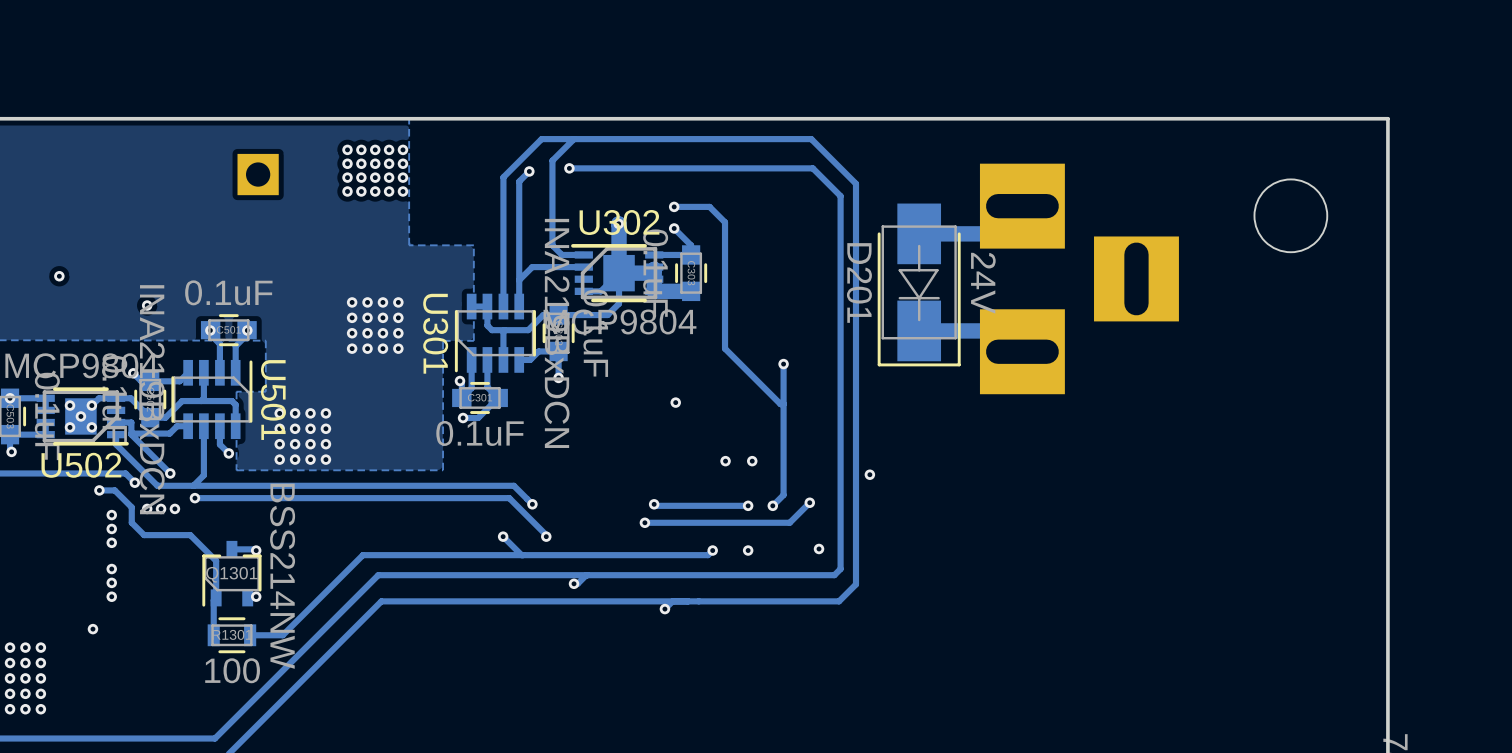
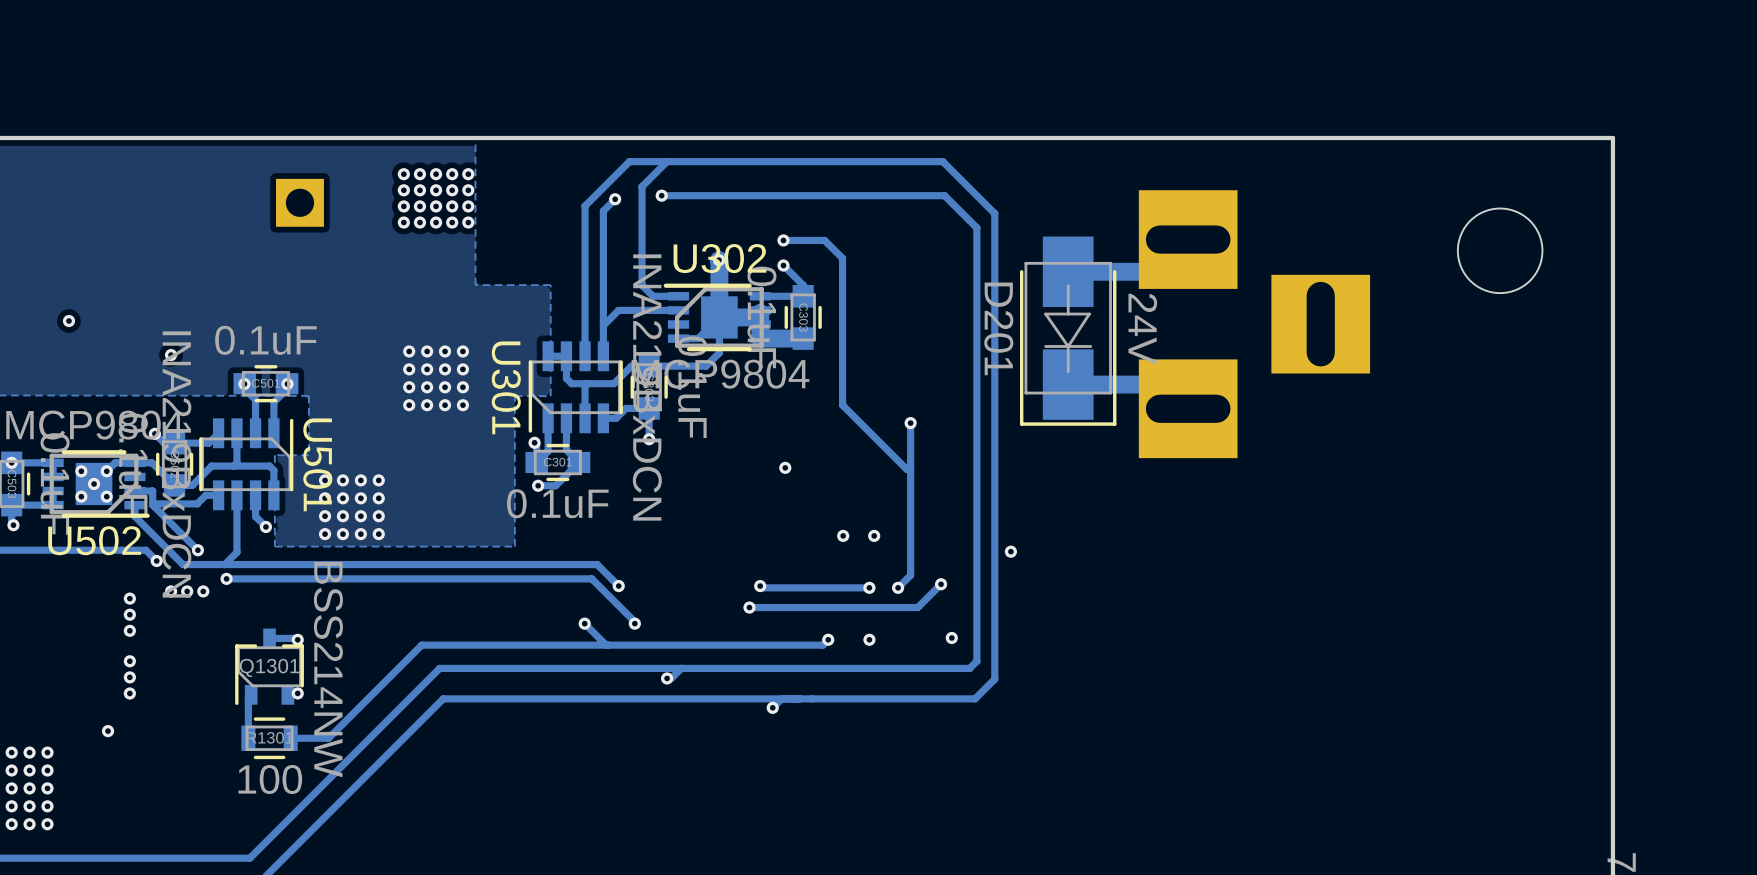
track: (99, 490) (114, 490) (131, 507) (131, 522) (144, 535) (190, 535) (216, 560) (216, 597) -> none
via: (99, 490) -> none

